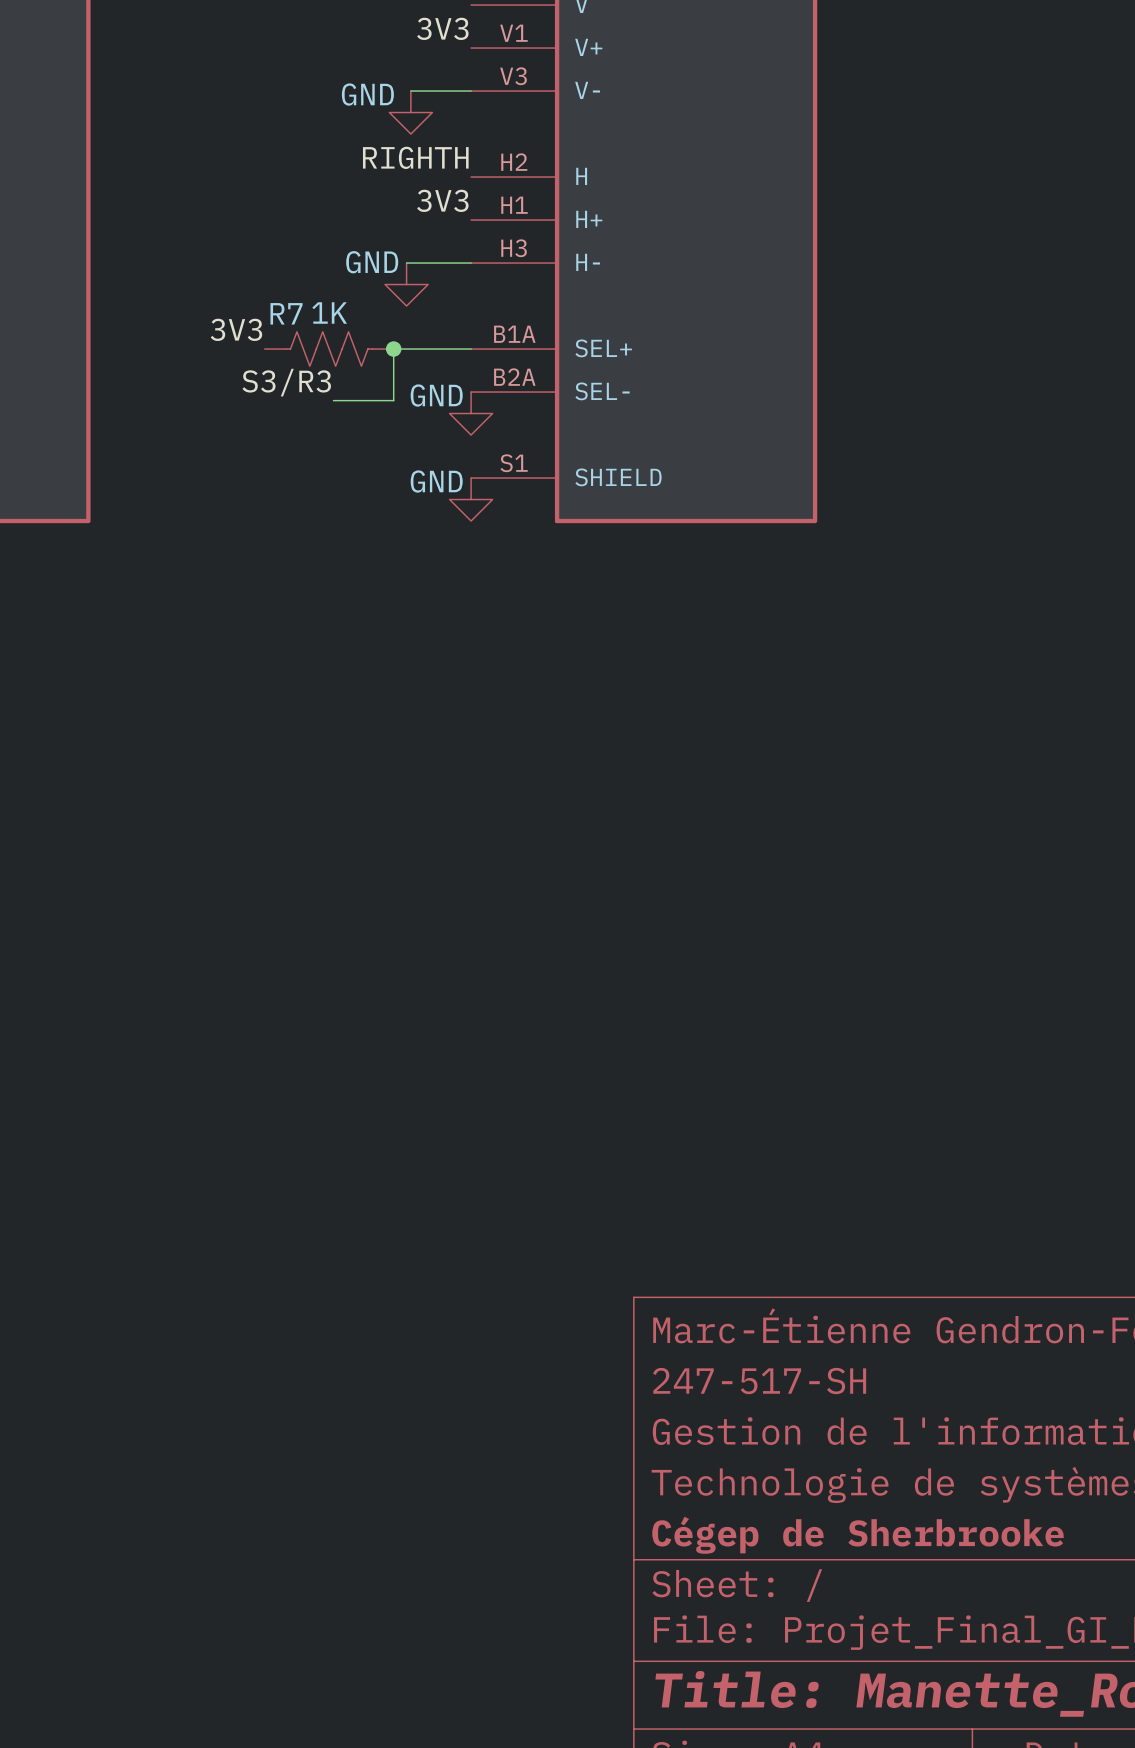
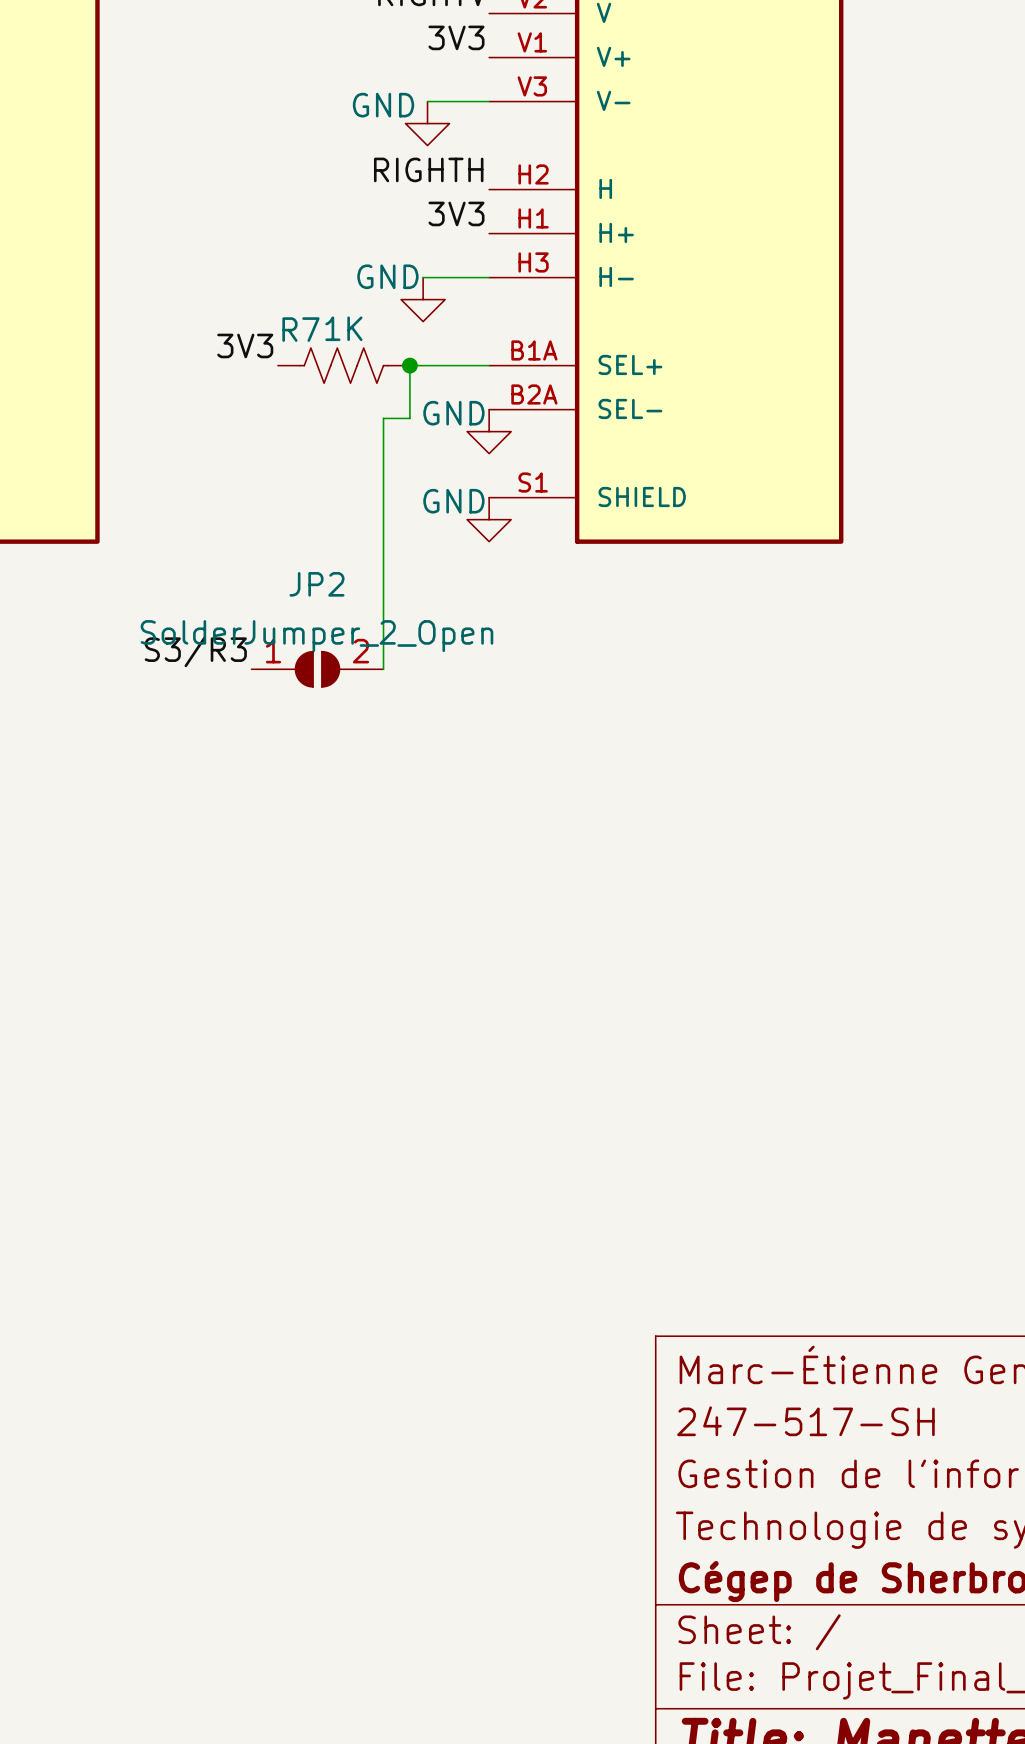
label position: S3/R3 (286, 382) -> S3/R3 (195, 651)
wire: (333, 400) (367, 400) -> (383, 669) (383, 418)
JP2: none -> SolderJumper_2_Open (317, 669)

